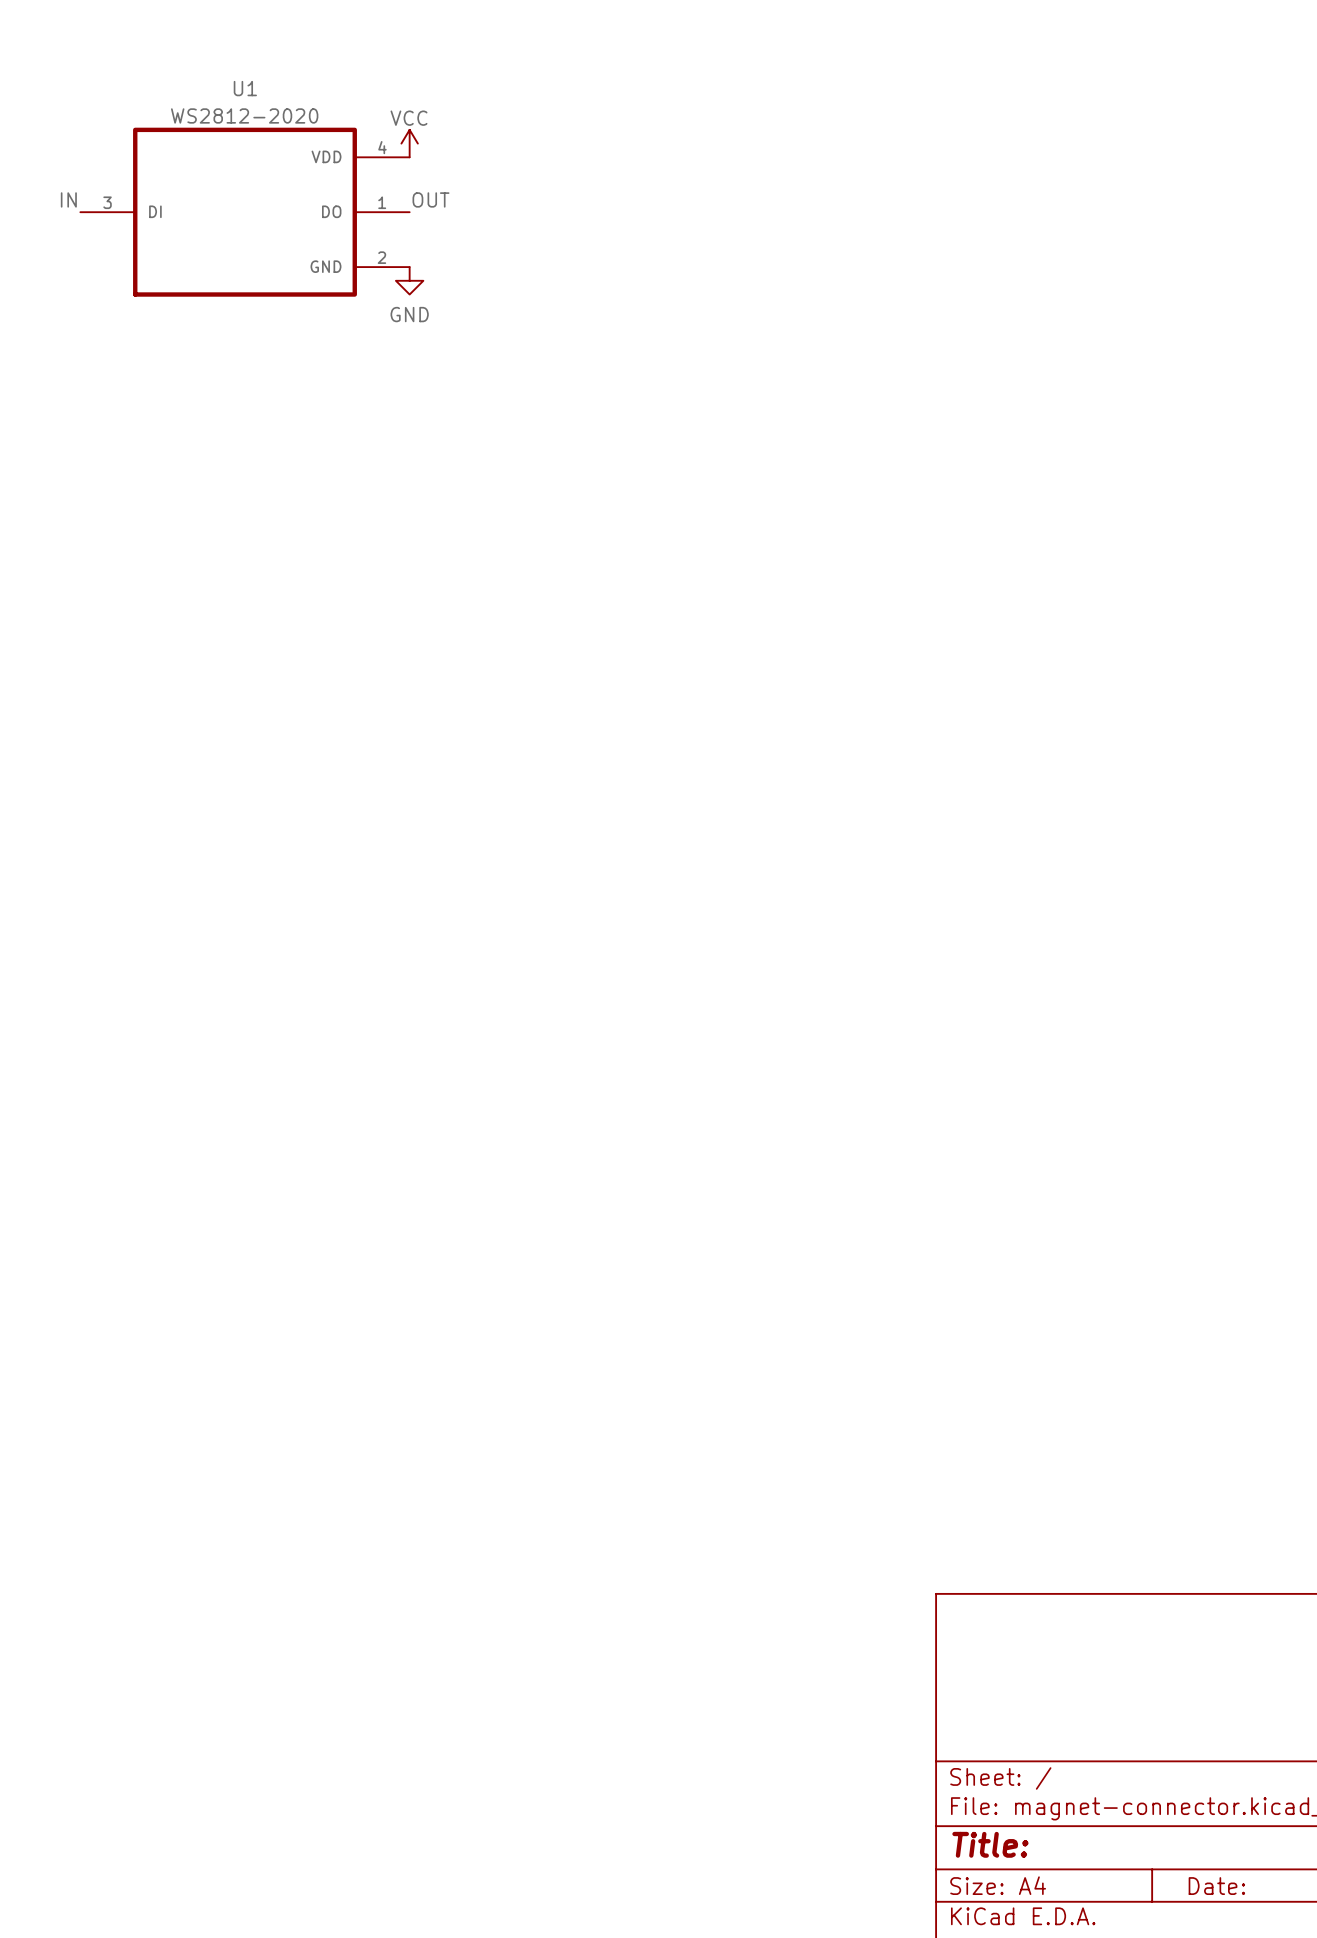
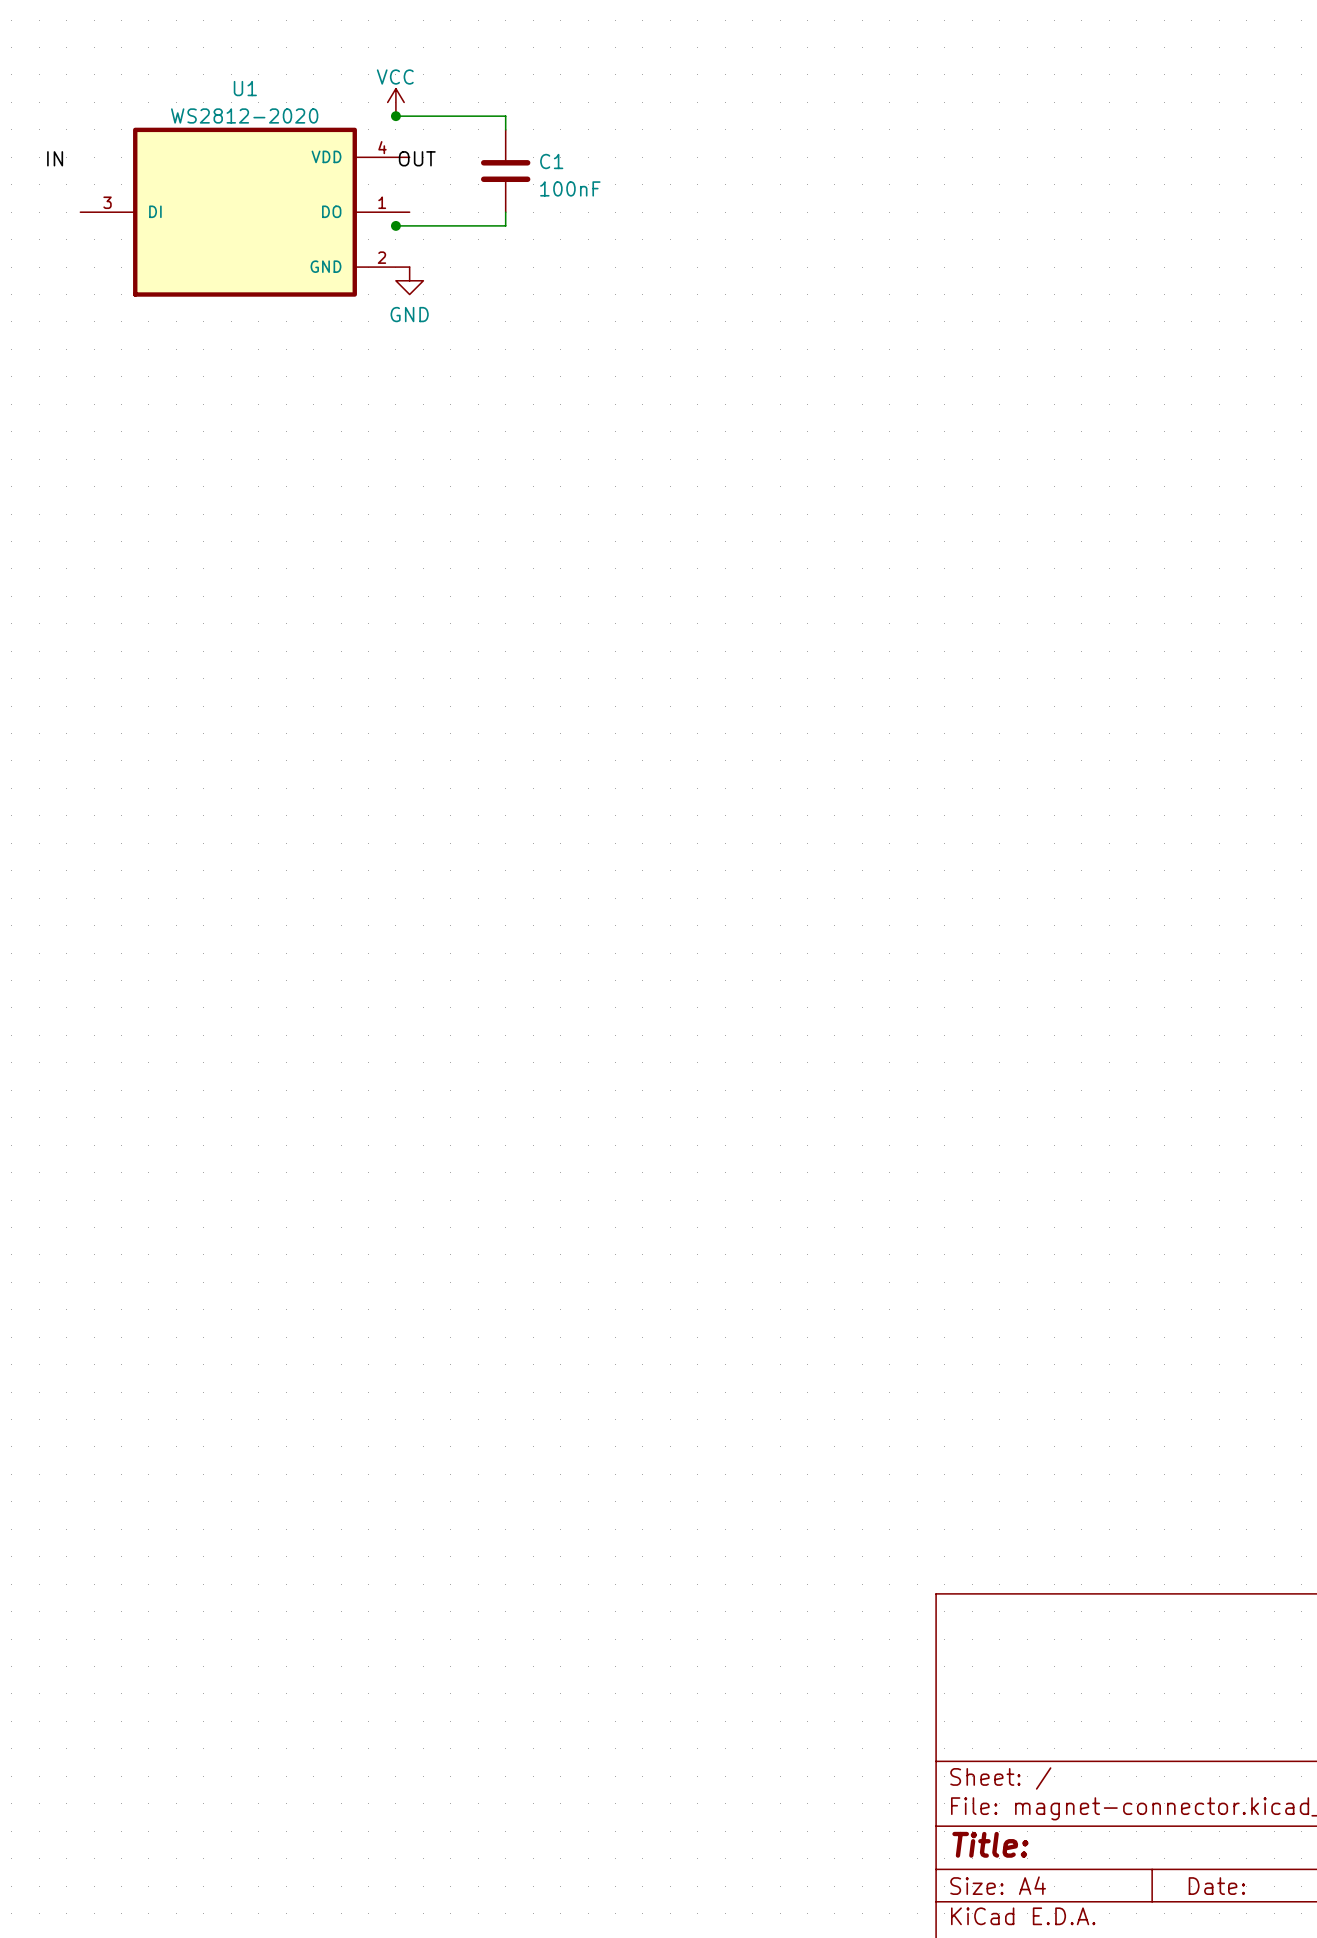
wire: none -> (395, 116) (505, 116) (505, 129)
junction: none -> (395, 116)
power symbol position: VCC (409, 143) -> VCC (395, 102)
C1: none -> 100nF (505, 171)
label position: IN (68, 199) -> IN (55, 158)
label position: OUT (430, 199) -> OUT (417, 158)
wire: none -> (505, 212) (505, 225) (395, 225)
junction: none -> (395, 225)

